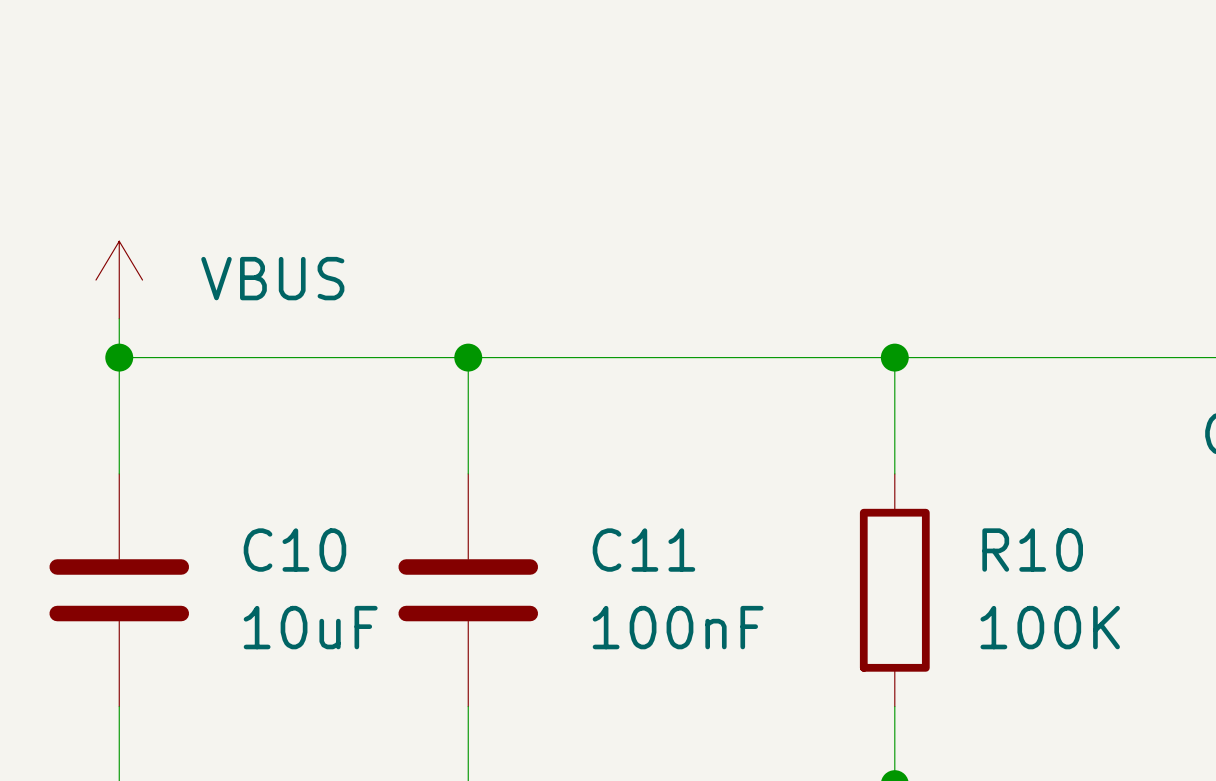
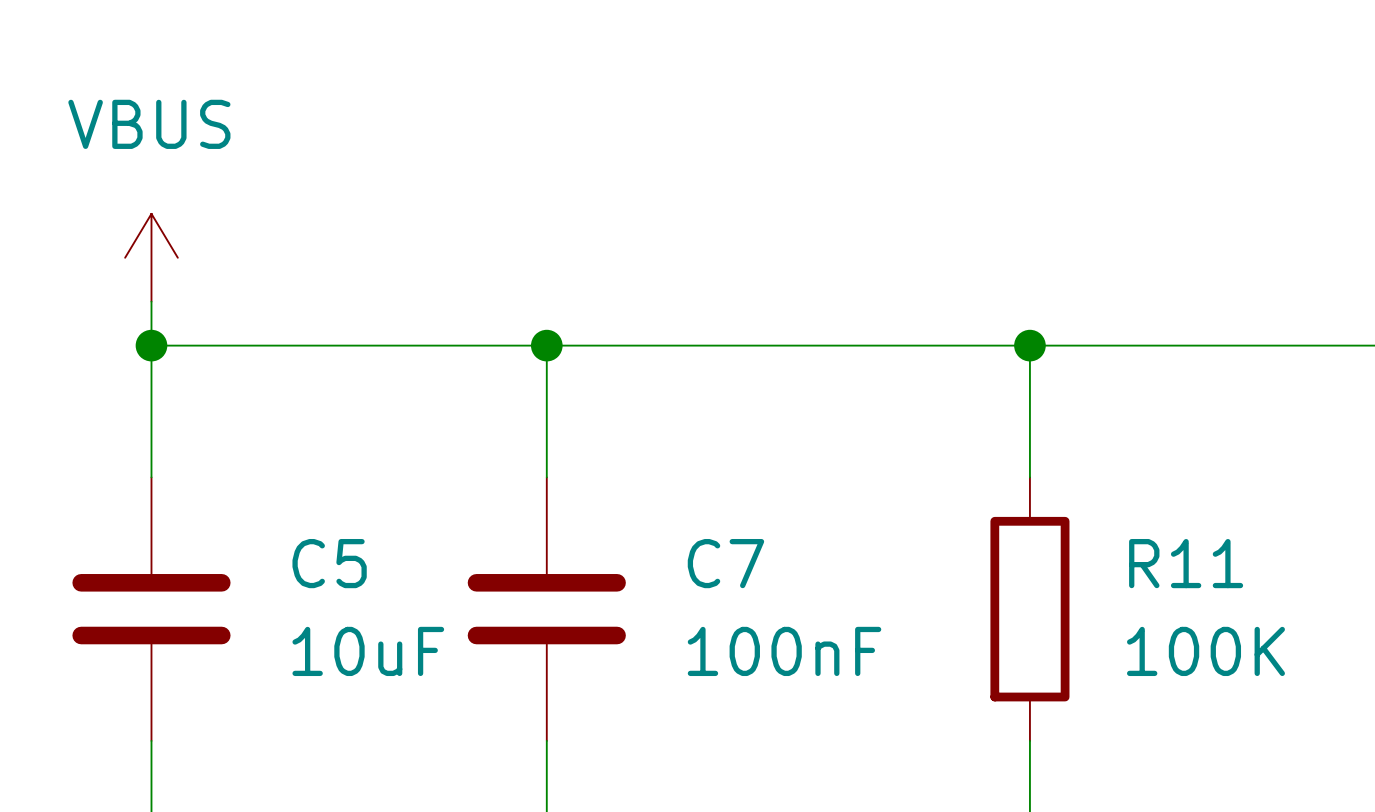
power symbol text position: VBUS (272, 278) -> VBUS (149, 124)
C10 name: C10 (294, 550) -> C5 (329, 563)
C11 name: C11 (643, 550) -> C7 (725, 563)
R10 name: R10 (1032, 550) -> R11 (1186, 563)

